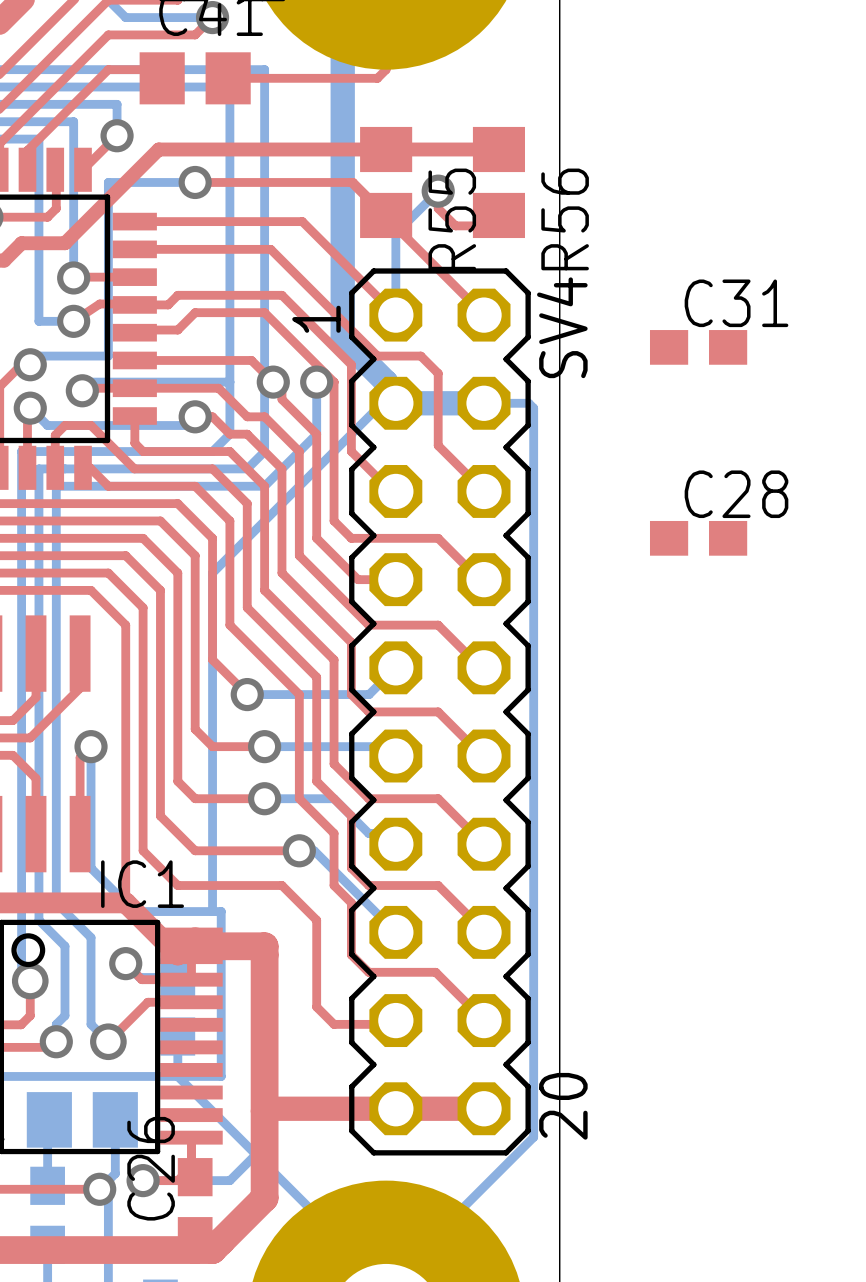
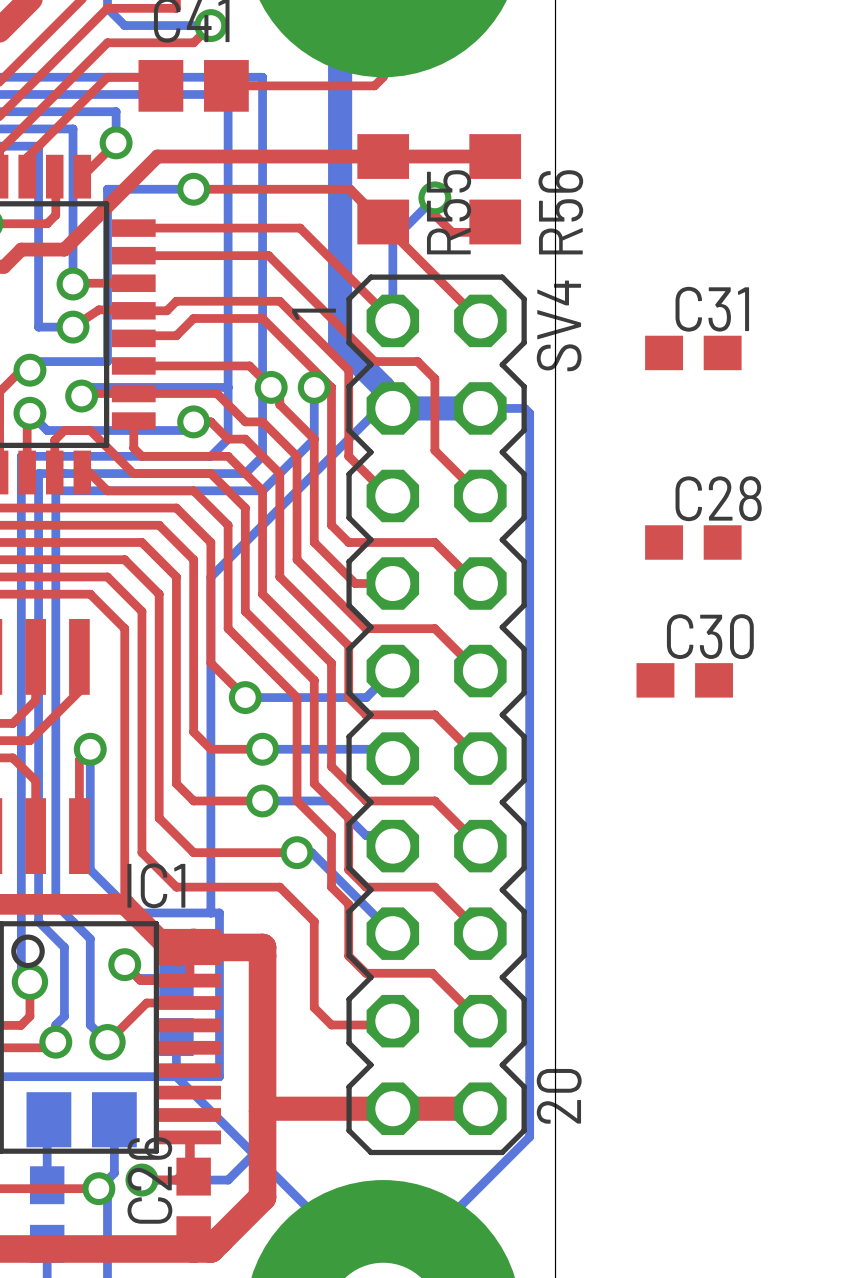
C30: none -> (684, 680)

